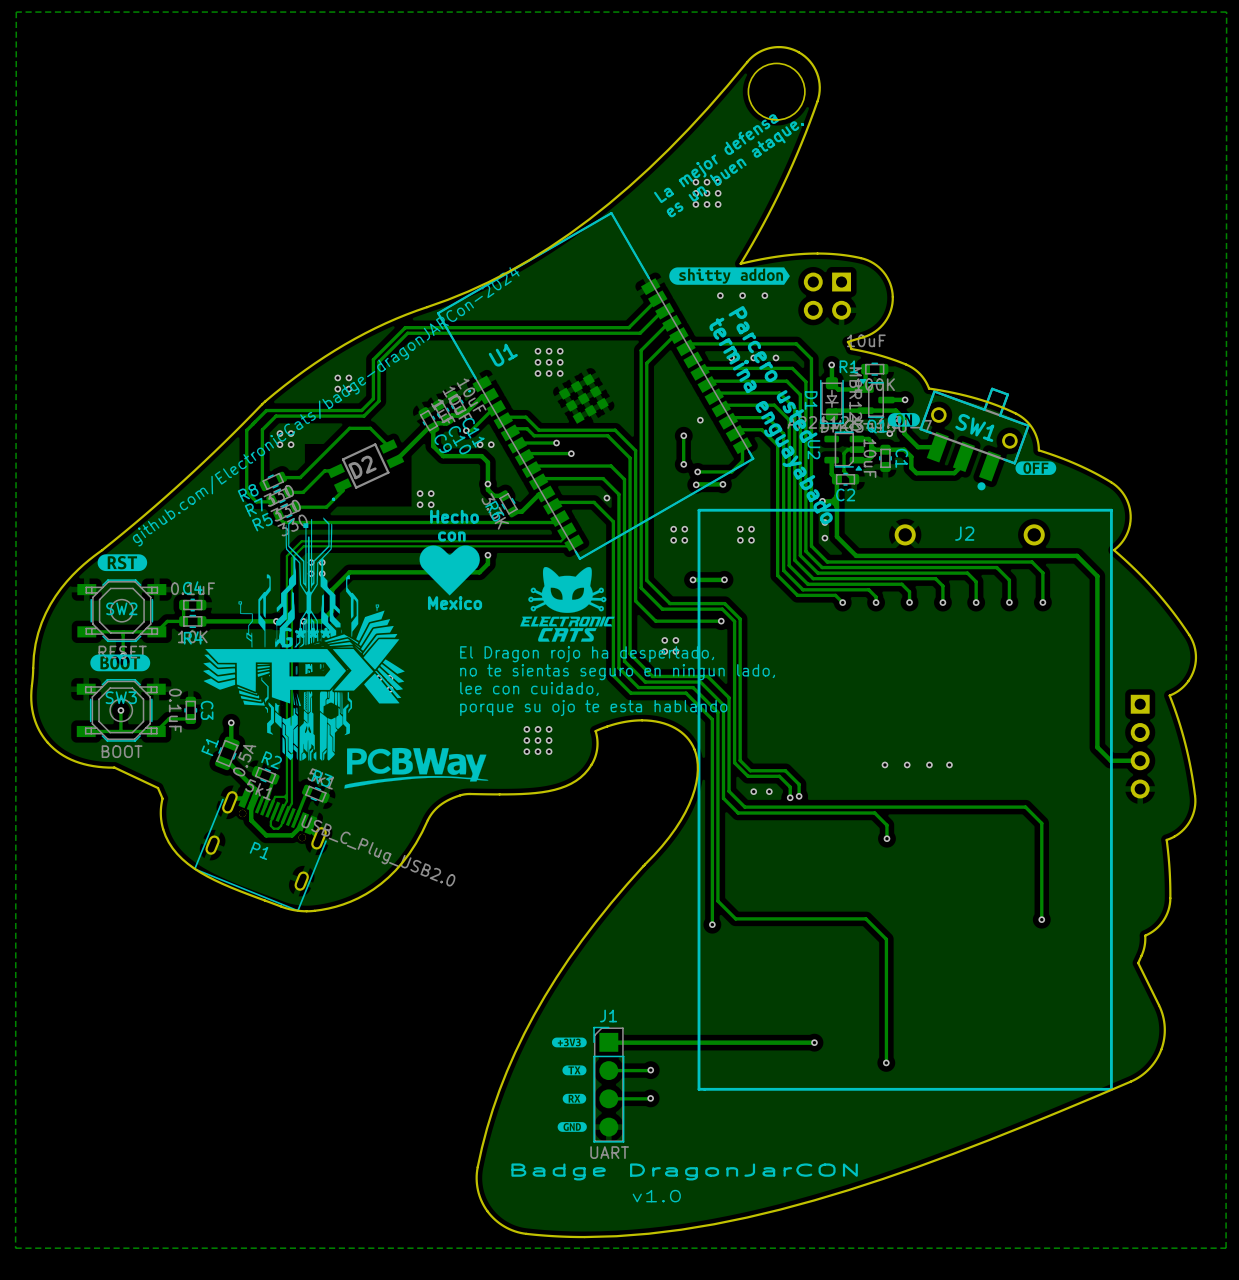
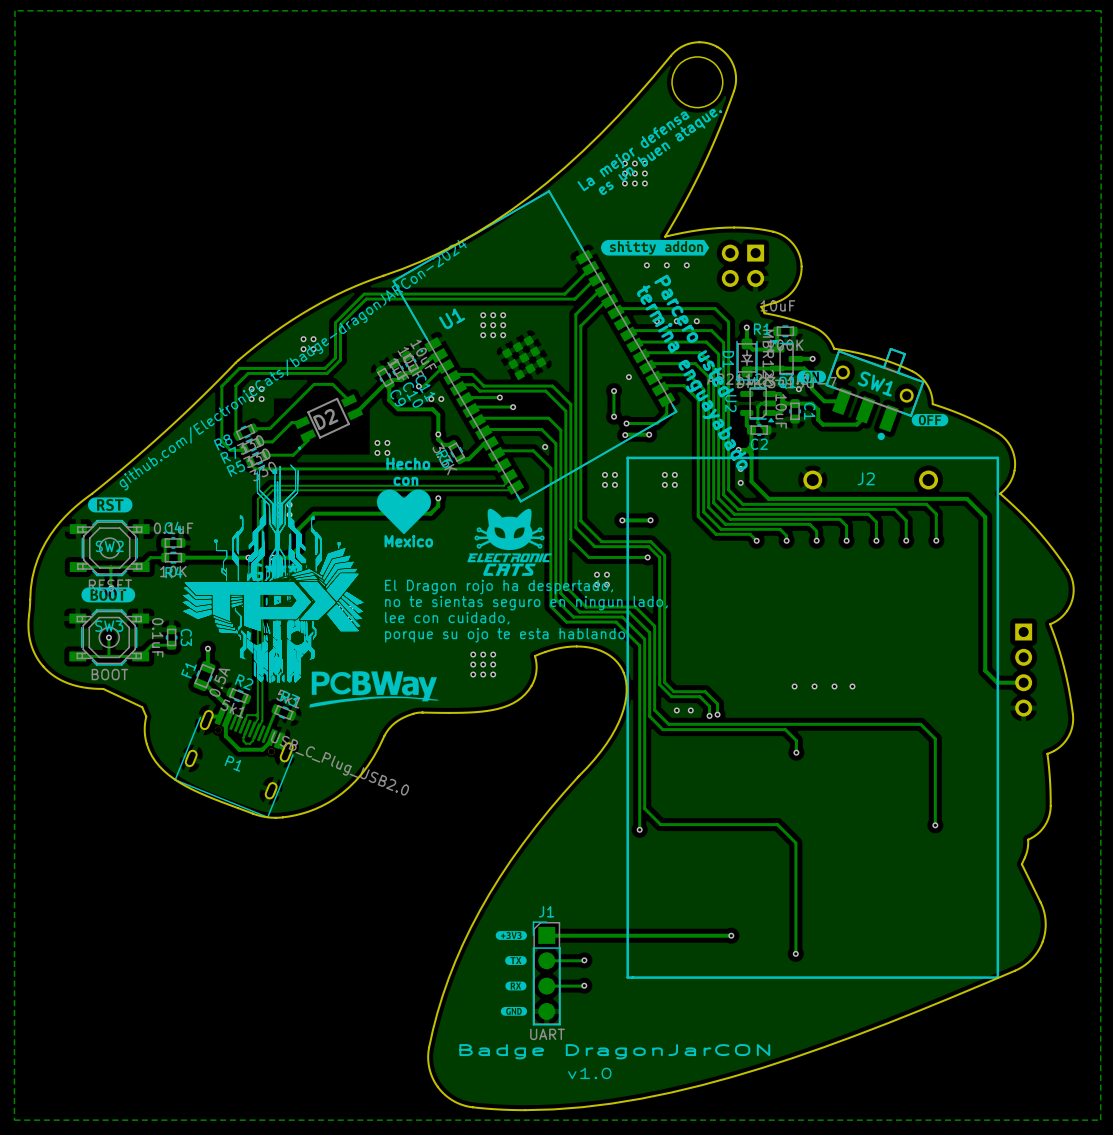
text position: La mejor defensa (716, 158) -> La mejor defensa (633, 151)
drawing: none -> [182, 464, 364, 683]
text position: El Dragon rojo ha despertado, (587, 654) -> El Dragon rojo ha despertado, (499, 587)
text position: no te sientas seguro en ningun lado, (617, 672) -> no te sientas seguro en ningun lado, (526, 603)
text position: lee con cuidado, (529, 689) -> lee con cuidado, (447, 618)
text position: porque su ojo te esta hablando (593, 707) -> porque su ojo te esta hablando (505, 635)

